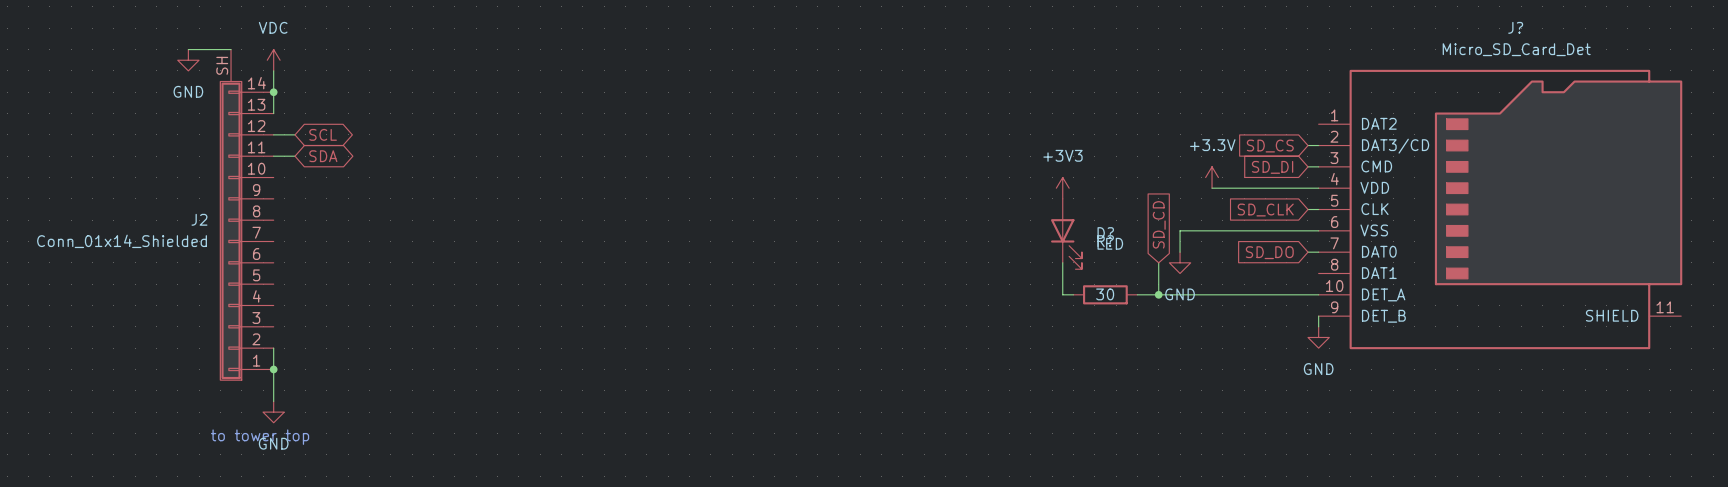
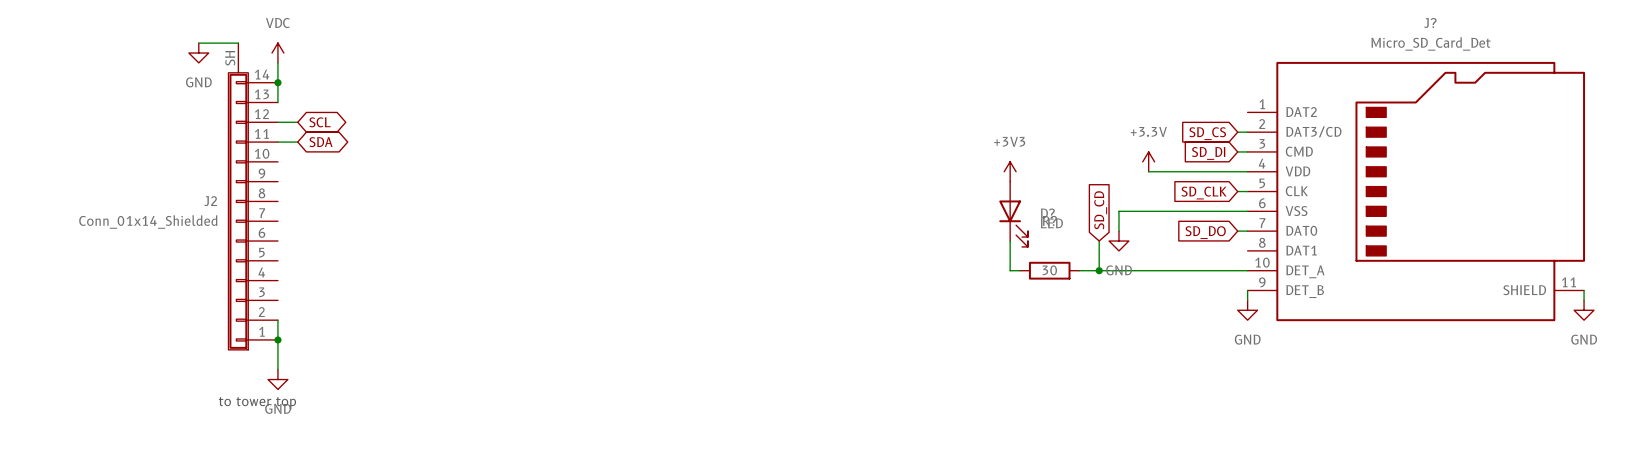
wire: none -> (1584, 290) (1584, 300)
power symbol: none -> GND (1584, 310)

